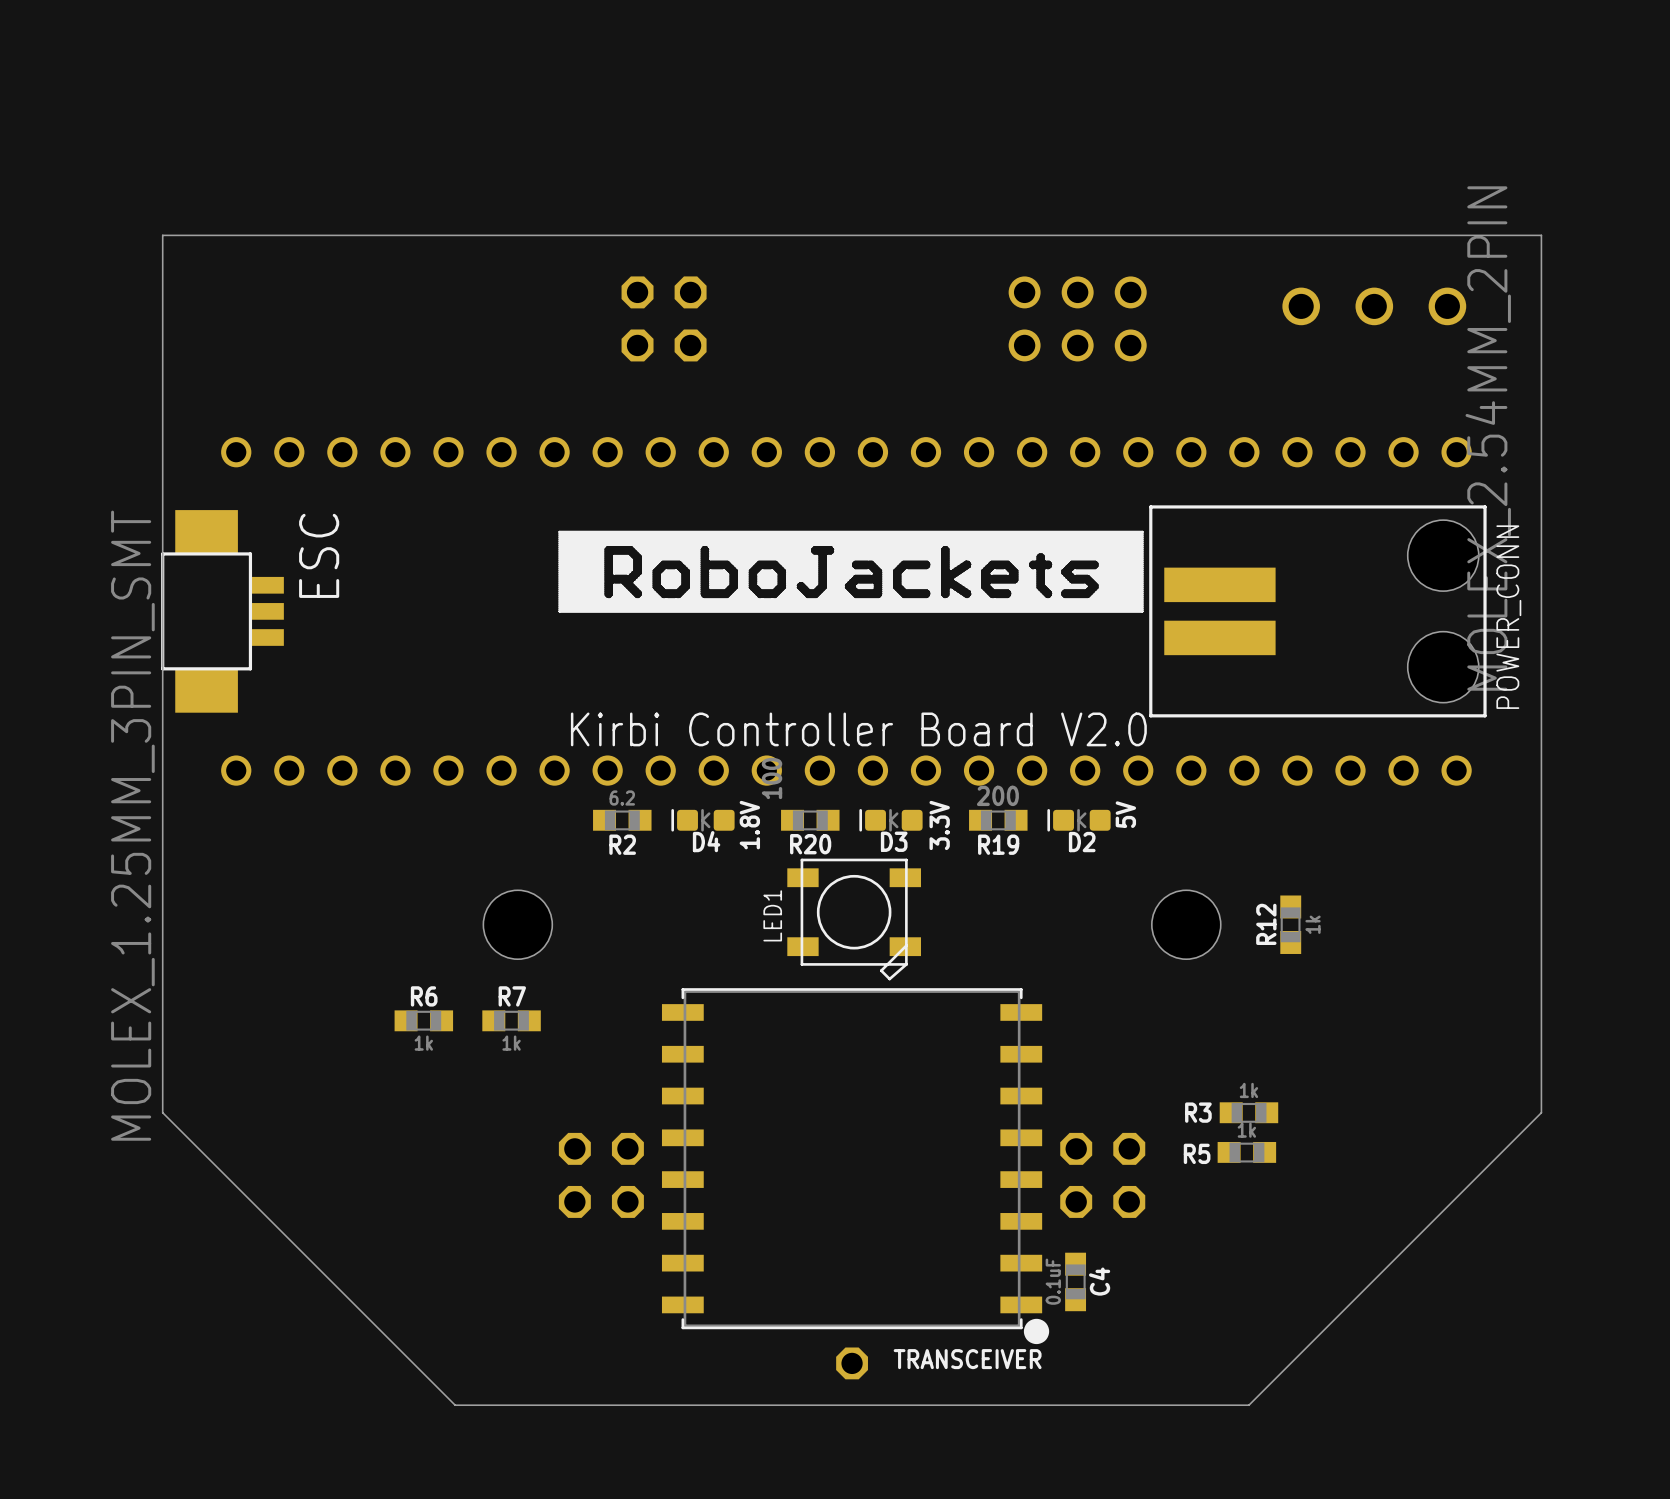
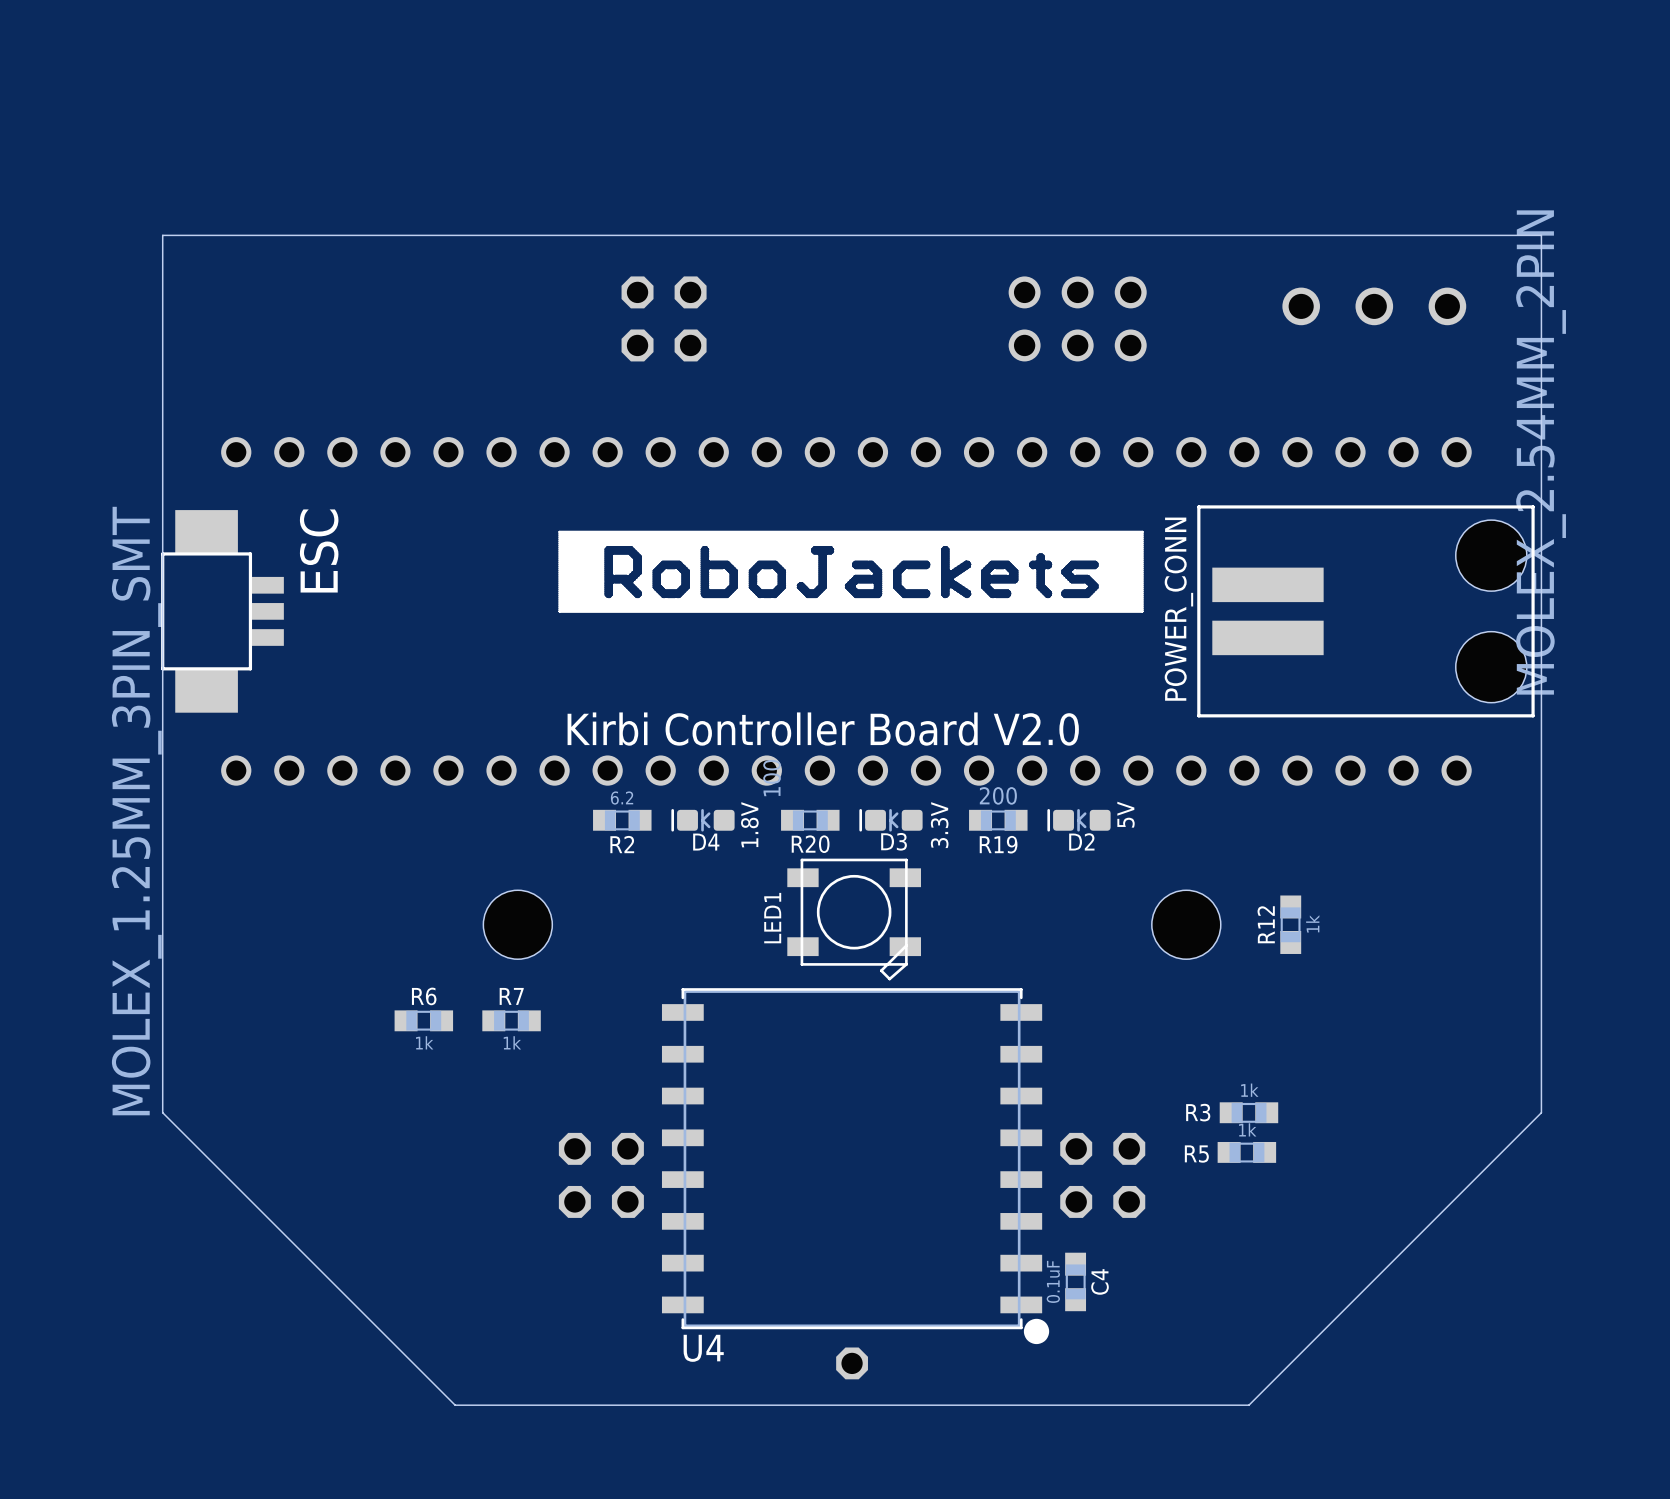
POWER_CONN position: (1317, 611) -> (1365, 611)
POWER_CONN name position: POWER_CONN (1508, 617) -> POWER_CONN (1178, 609)
TRANSCEIVER name: TRANSCEIVER (967, 1359) -> U4 (703, 1348)

